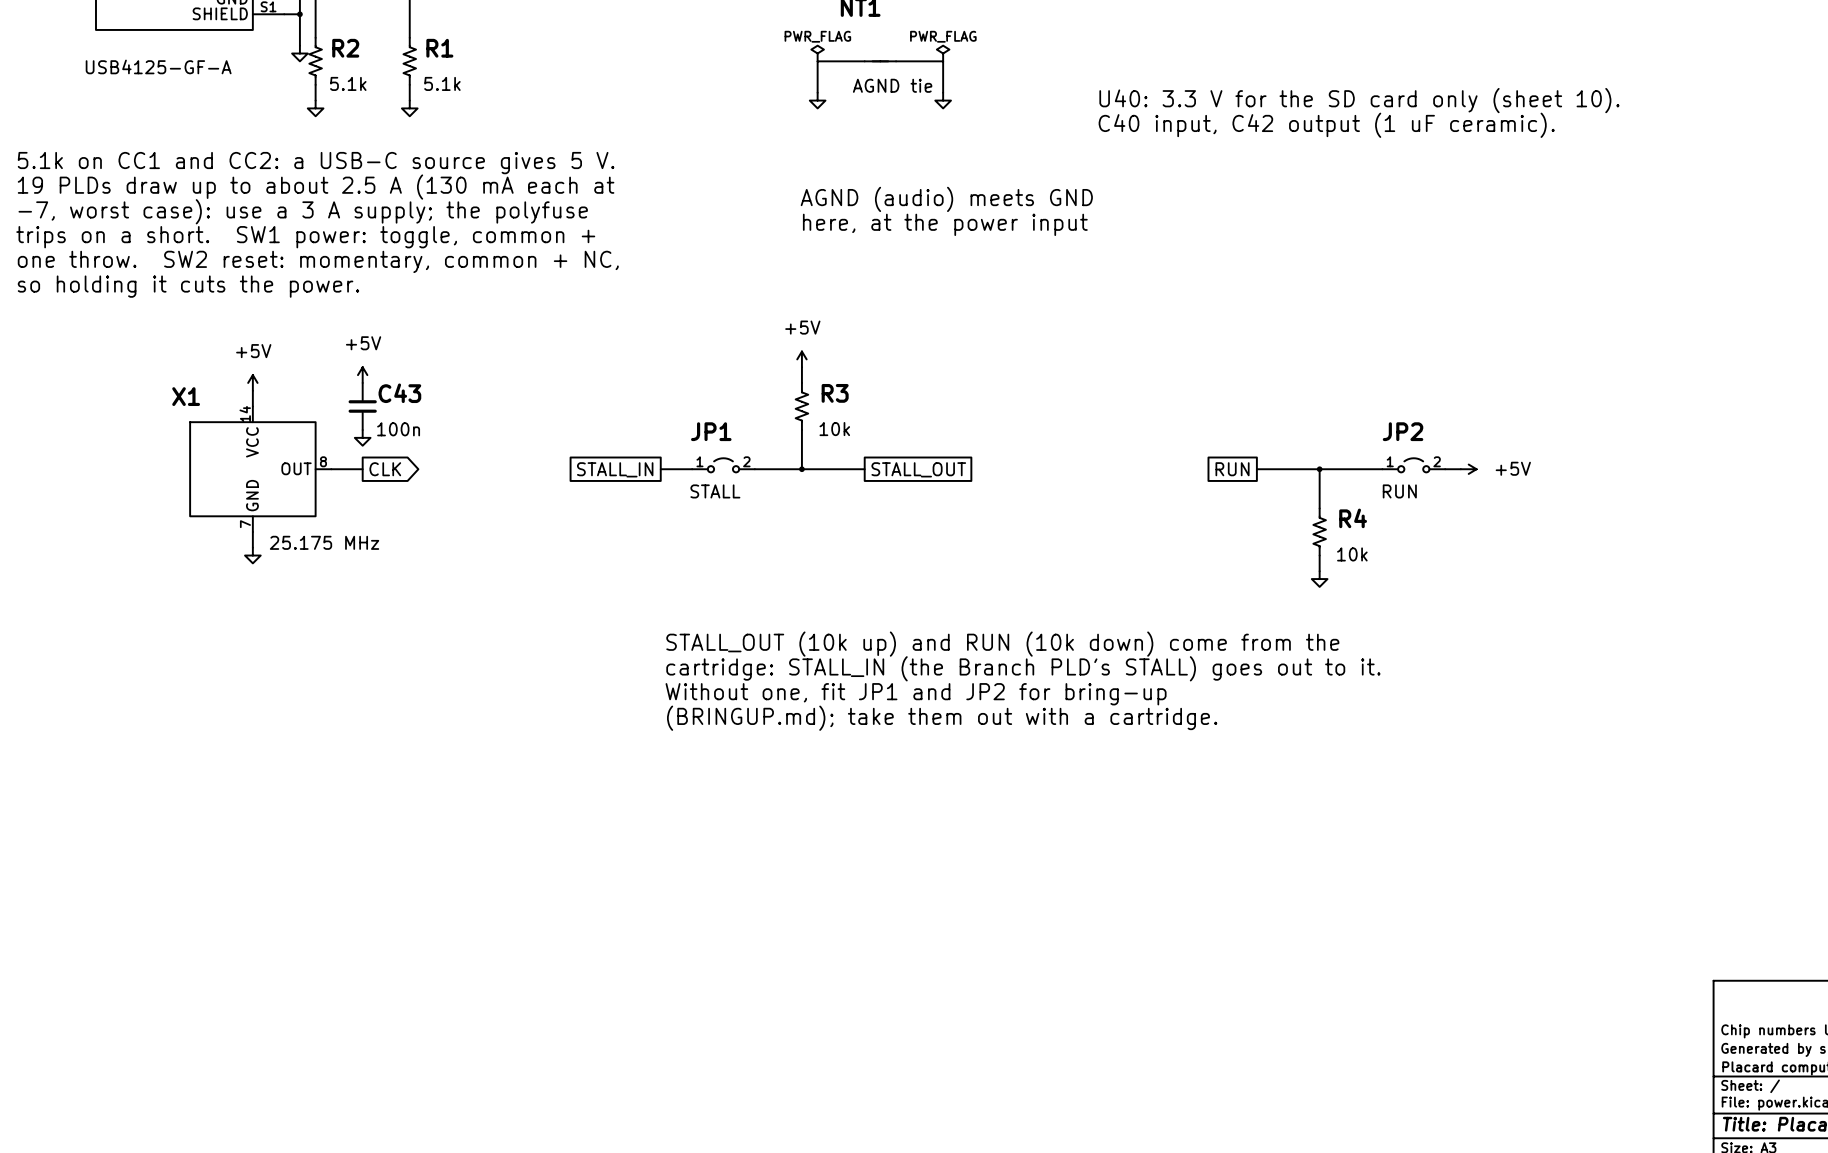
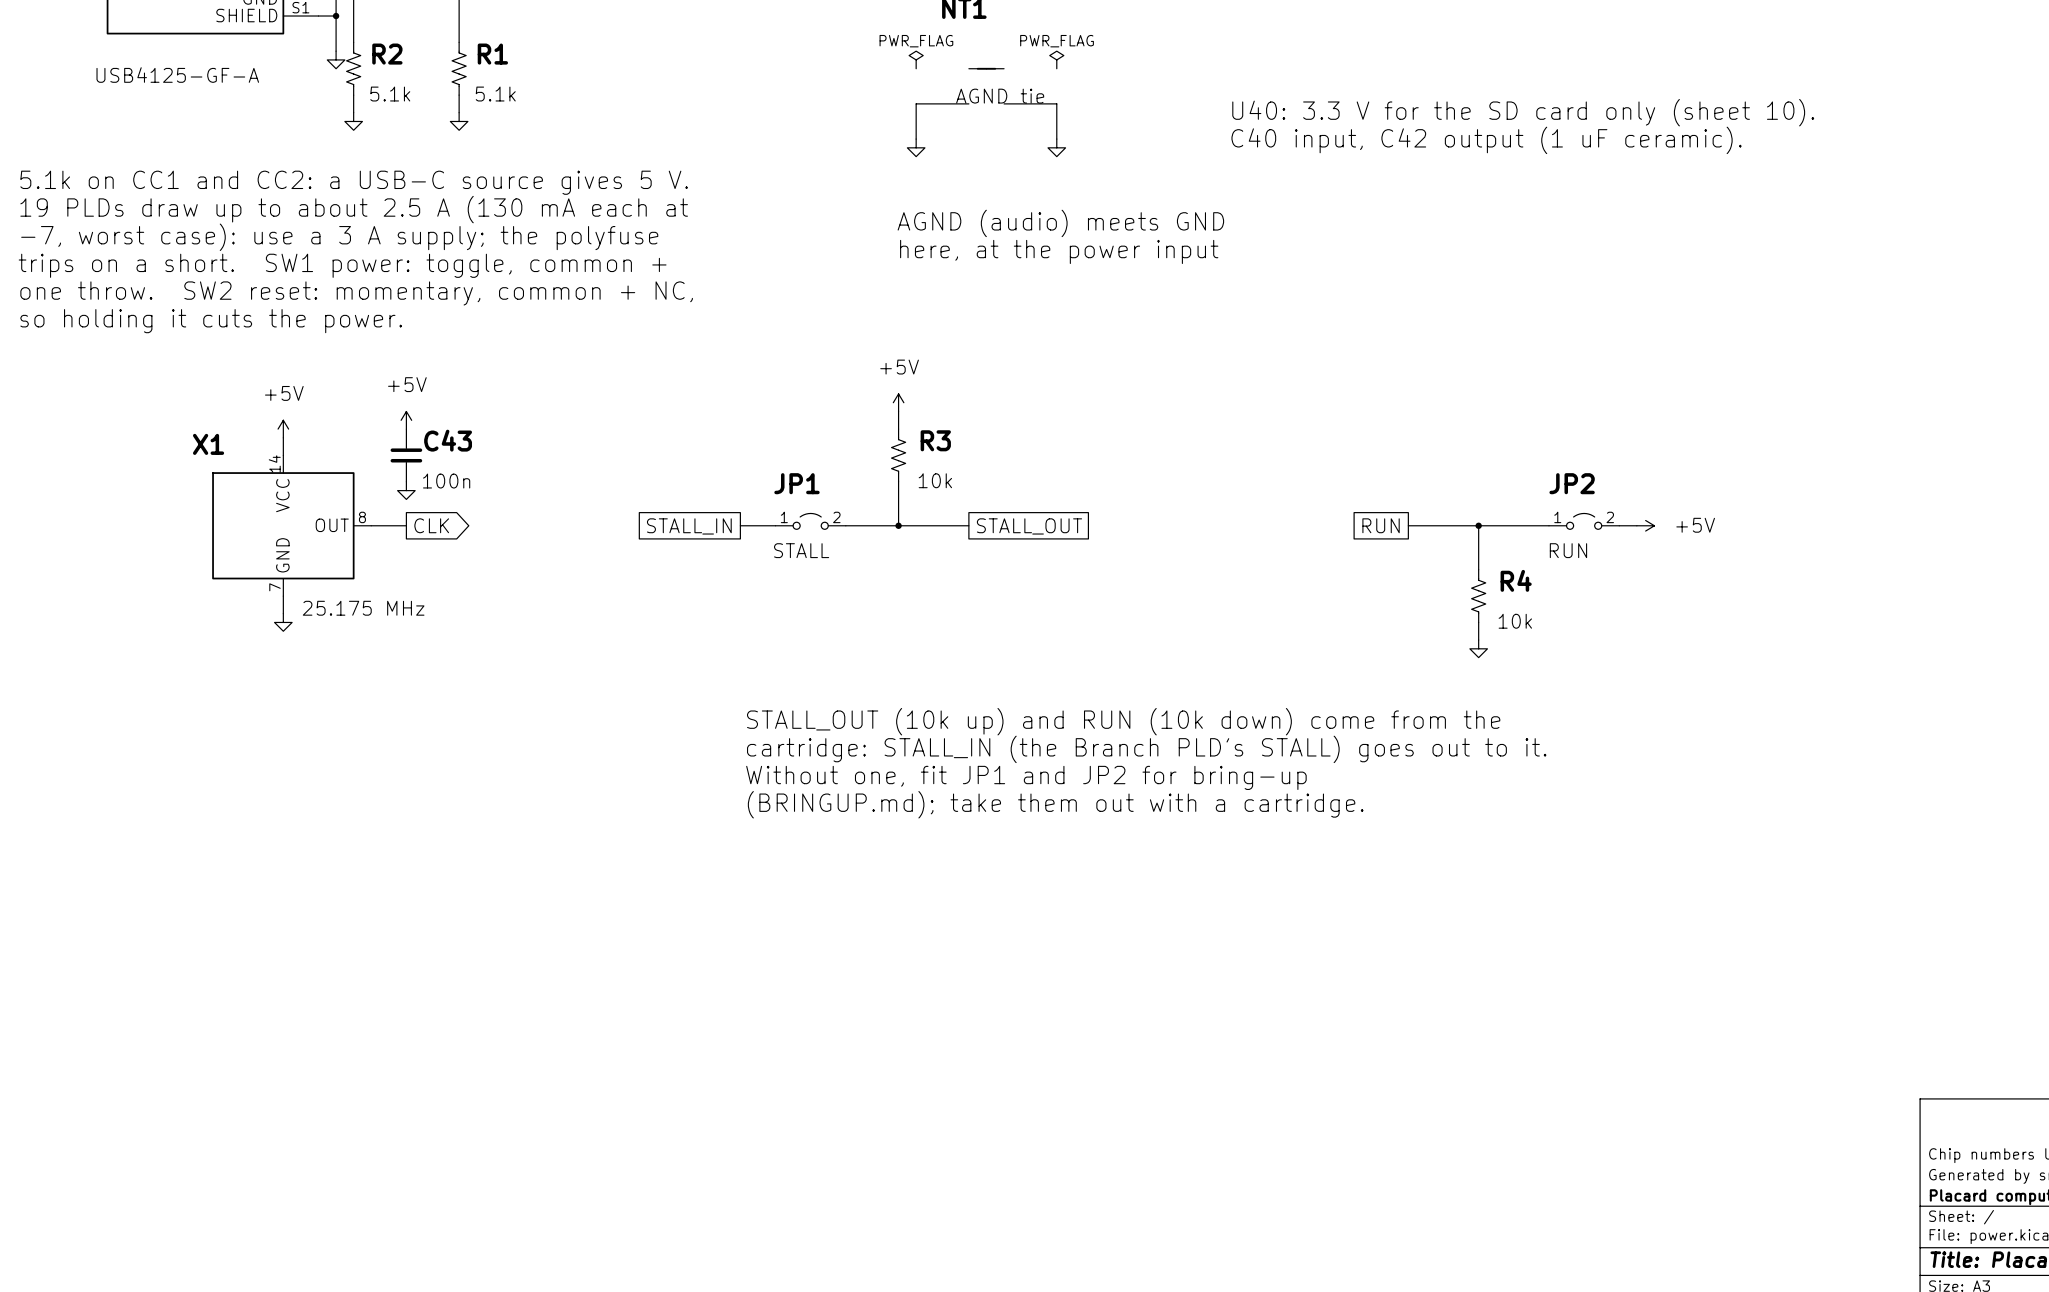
wire: (864, 61) (817, 61) (817, 92) -> (968, 103) (916, 103) (916, 139)
wire: (896, 61) (943, 61) (943, 92) -> (1004, 103) (1056, 103) (1056, 139)
power symbol position: (817, 100) -> (916, 147)
power symbol position: (943, 100) -> (1056, 147)

